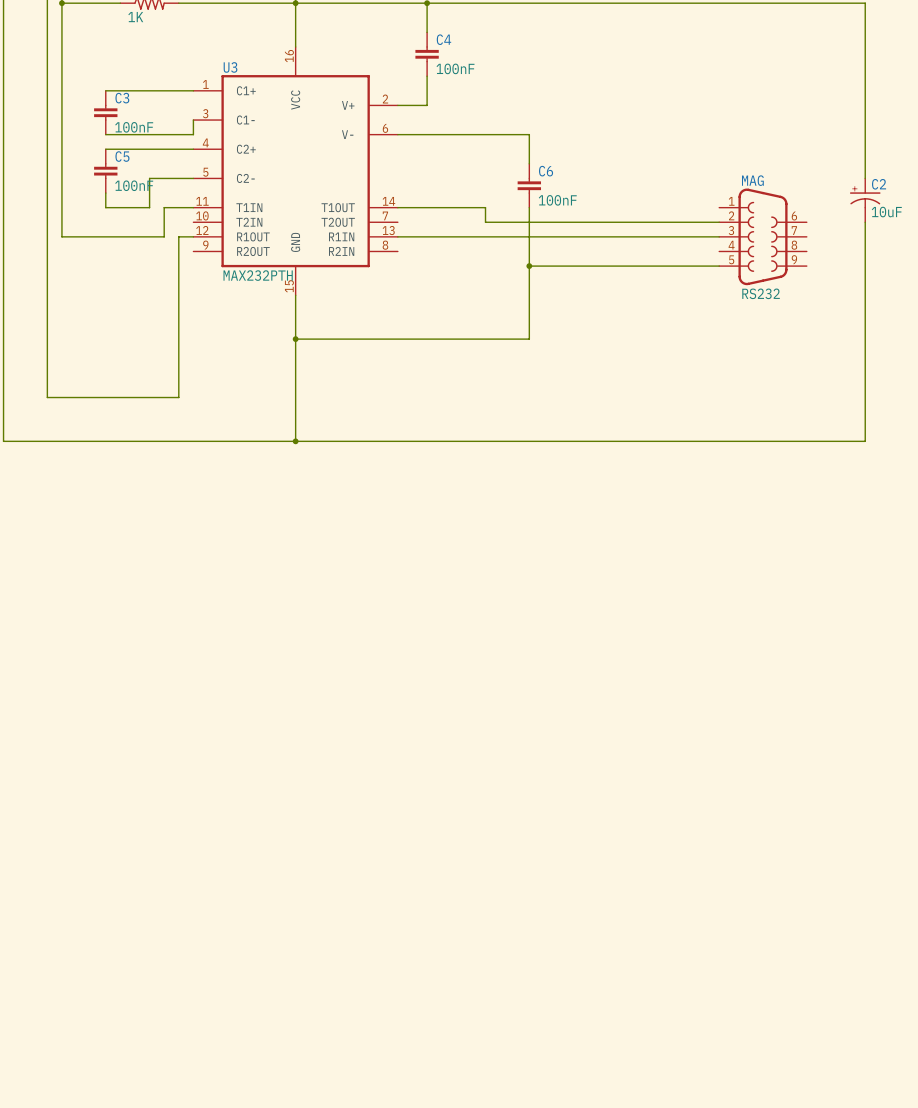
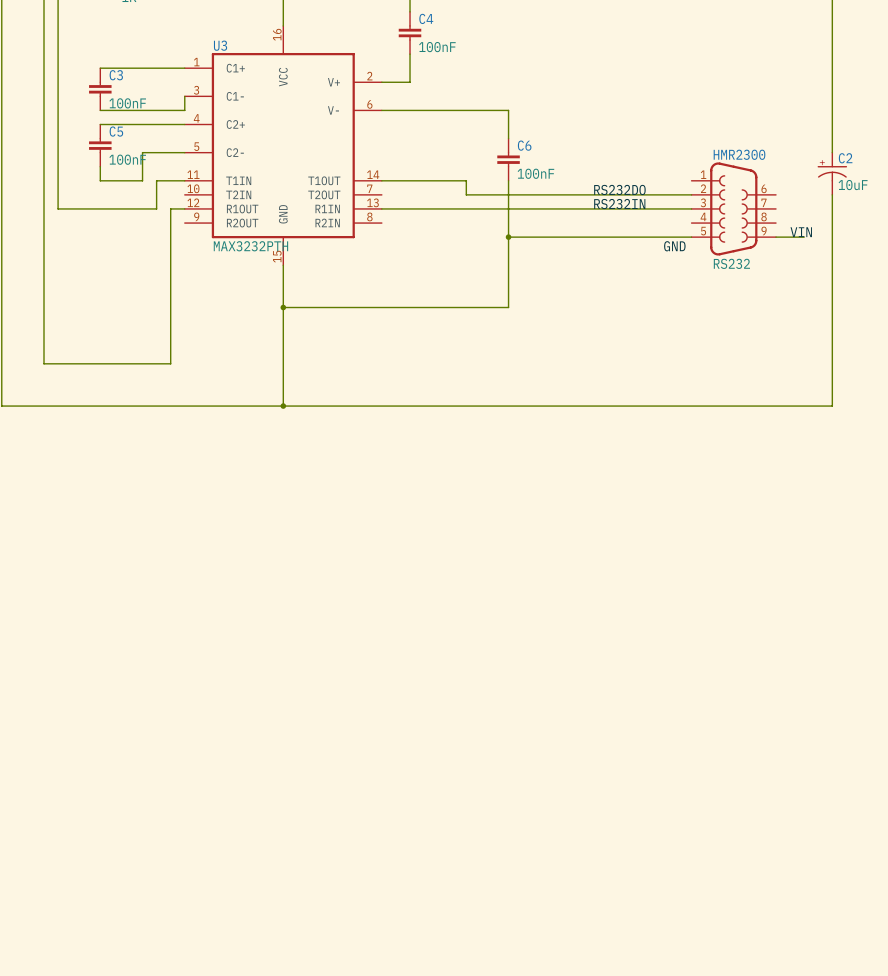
MAG name: MAG (752, 180) -> HMR2300 (739, 154)
label: none -> RS232DO (619, 189)
label: none -> RS232IN (619, 204)
label: none -> VIN (801, 232)
wire: none -> (776, 237) (804, 237)
U3 value: MAX232PTH (258, 275) -> MAX3232PTH (250, 246)
label: none -> GND (674, 246)

